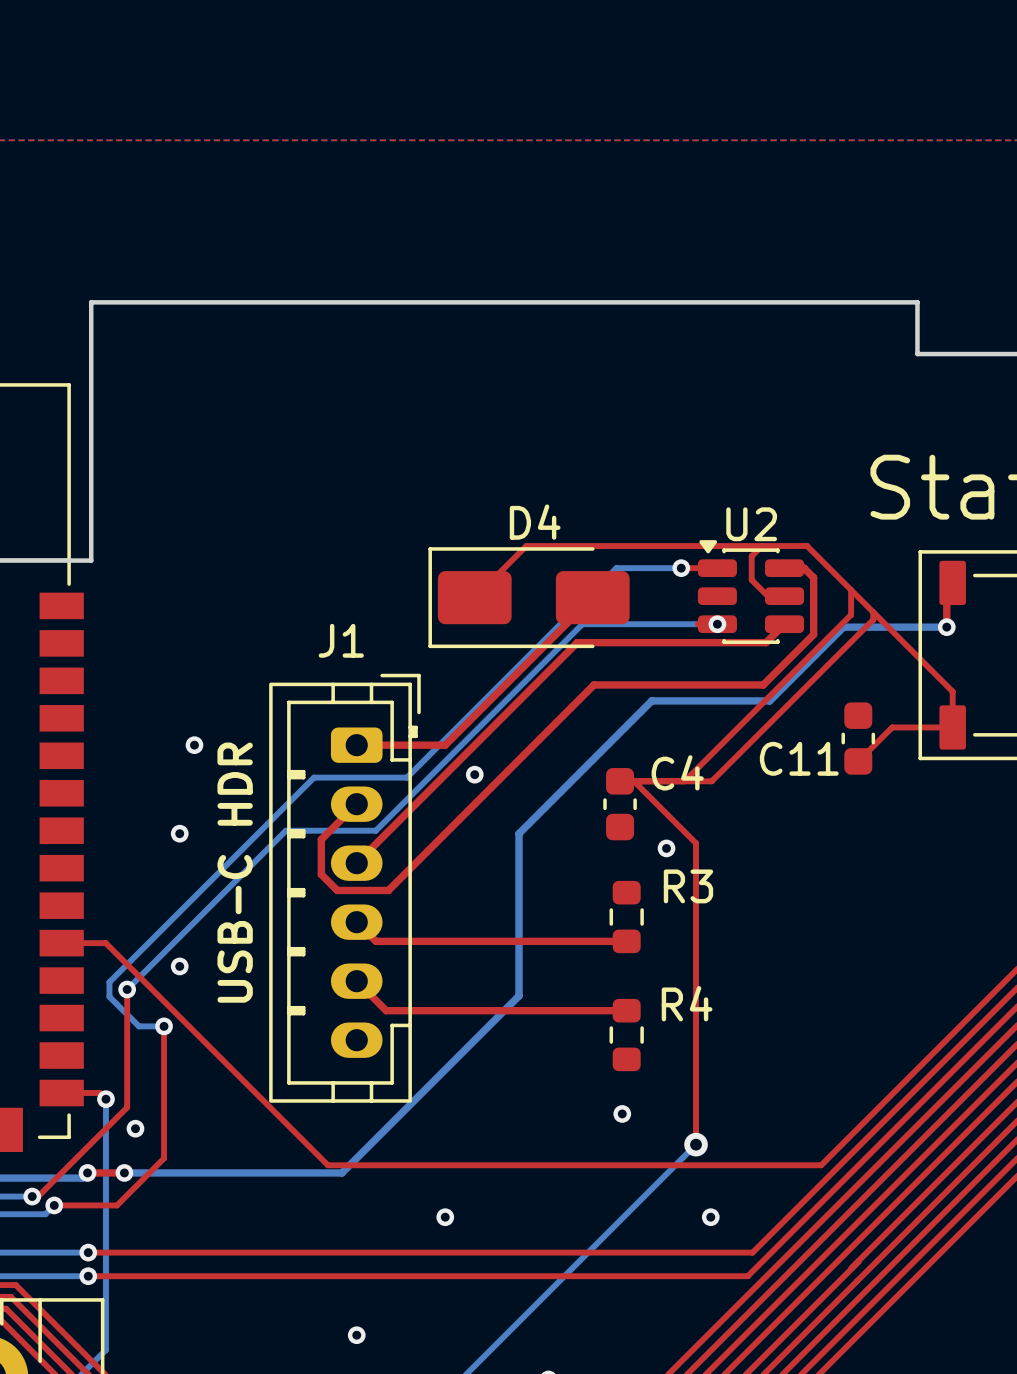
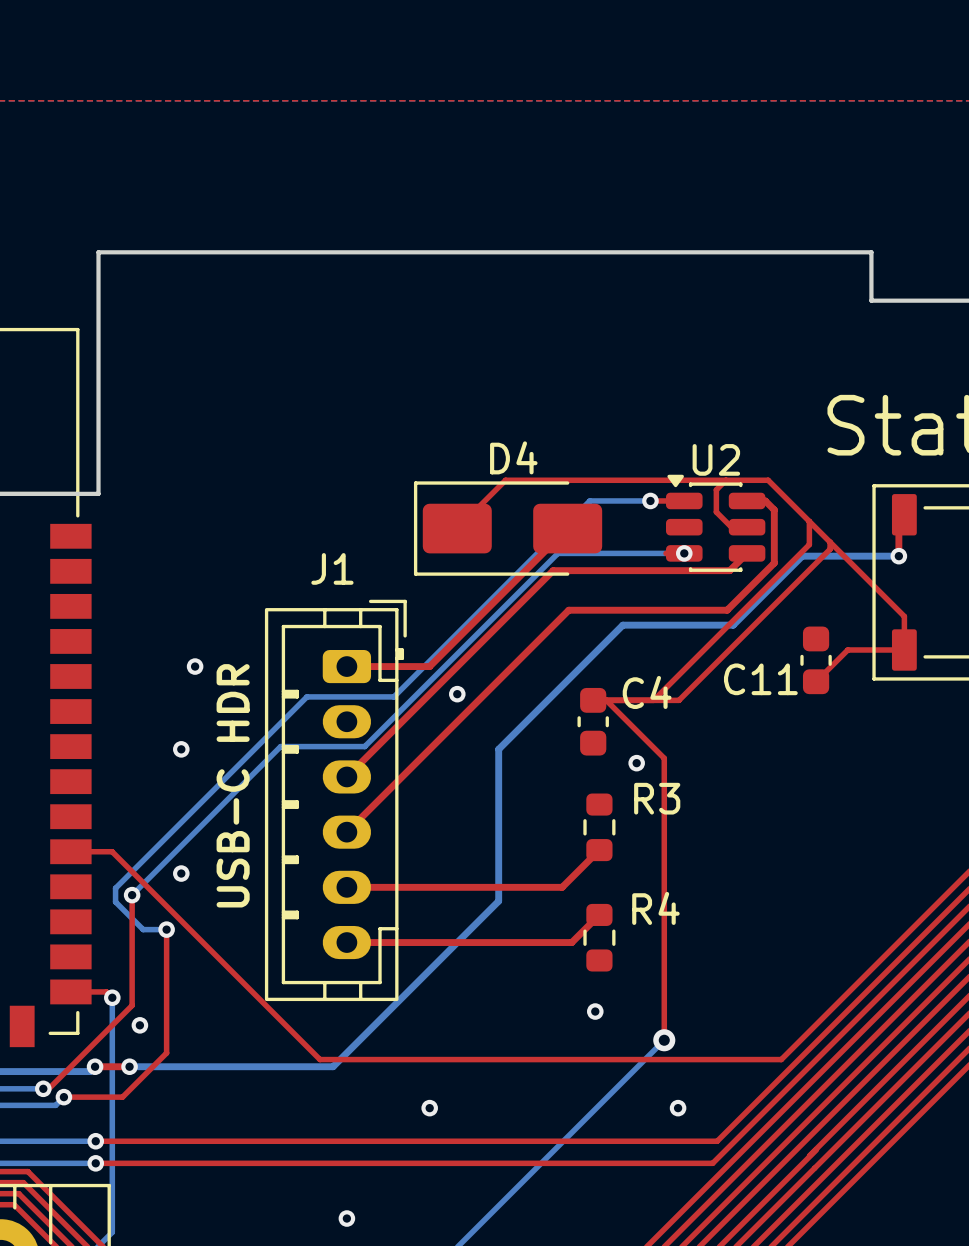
top track: (356, 804) (321, 839) (321, 874) (337, 890) (388, 890) -> (346, 832) (376, 802)
top track: (366, 931) (375, 941) (626, 941) -> (346, 887) (562, 887) (599, 850)
top track: (356, 981) (386, 1010) (626, 1010) -> (346, 942) (571, 942) (599, 914)

